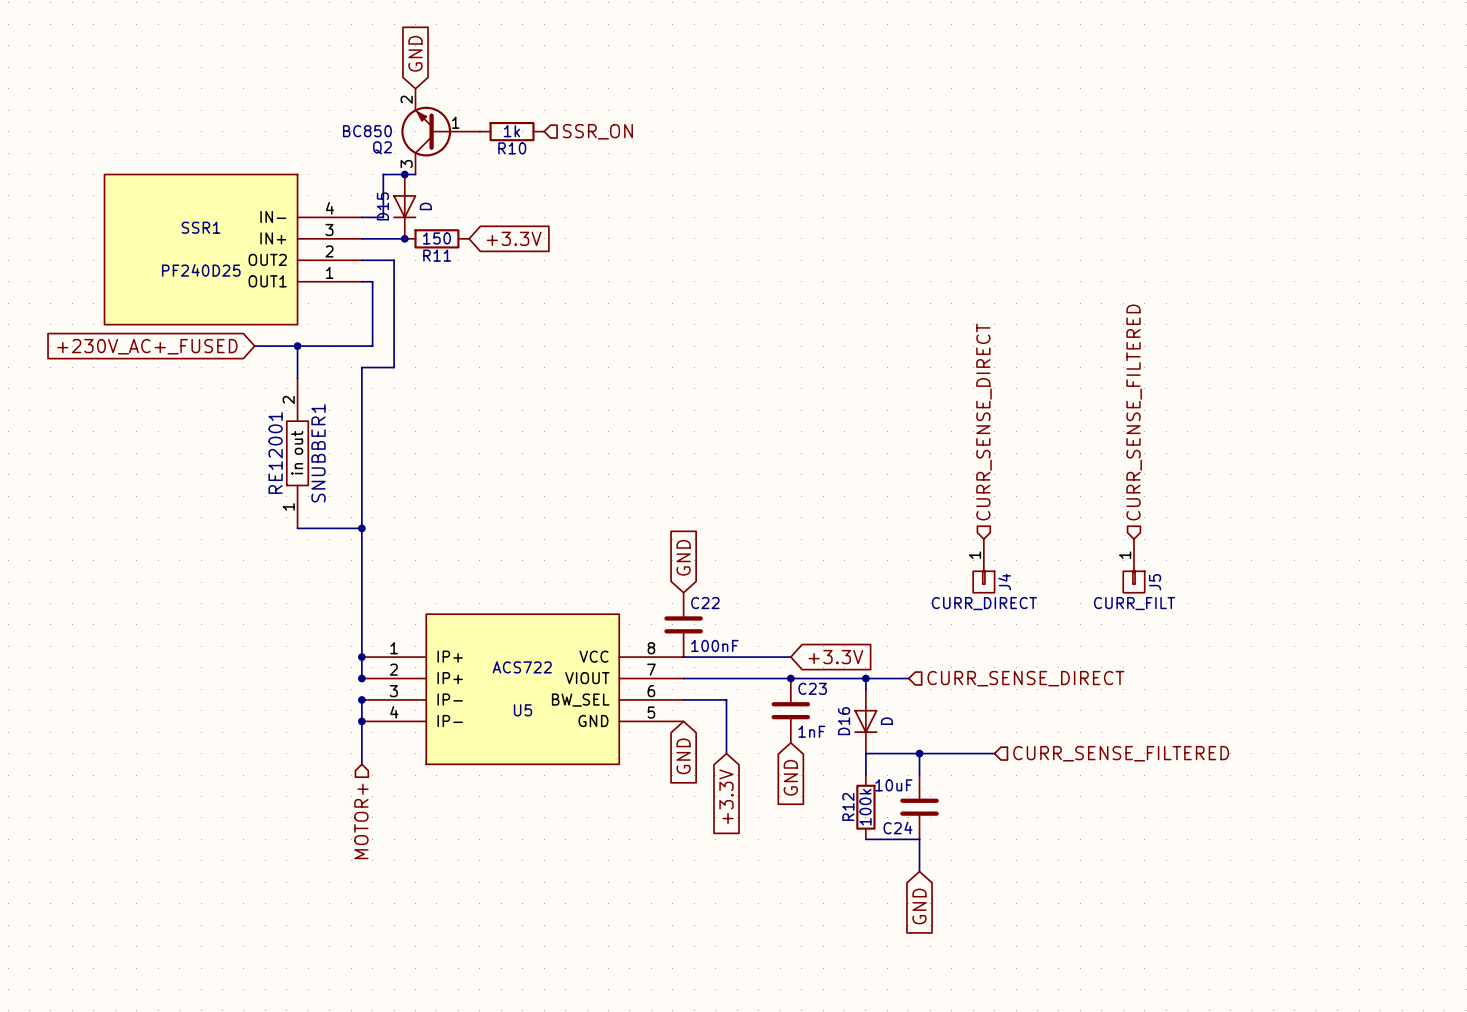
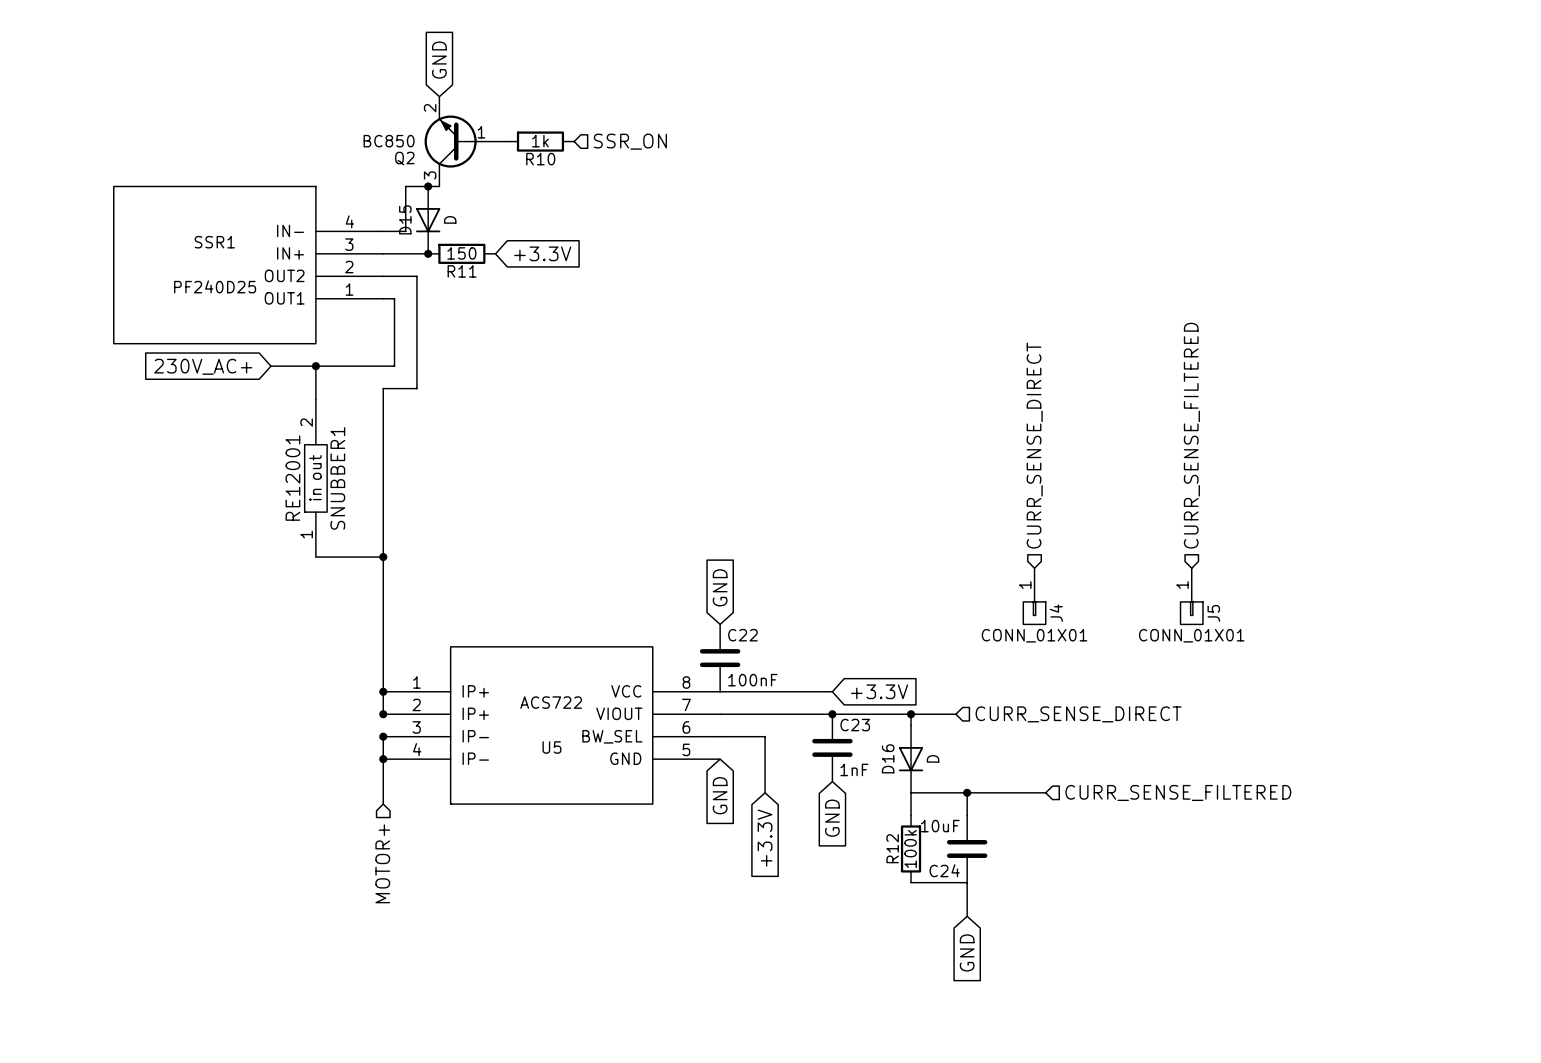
global label: +230V_AC+_FUSED (147, 346) -> 230V_AC+ (203, 366)
J4 value: CURR_DIRECT (984, 603) -> CONN_01X01 (1034, 635)
J5 value: CURR_FILT (1134, 603) -> CONN_01X01 (1191, 635)

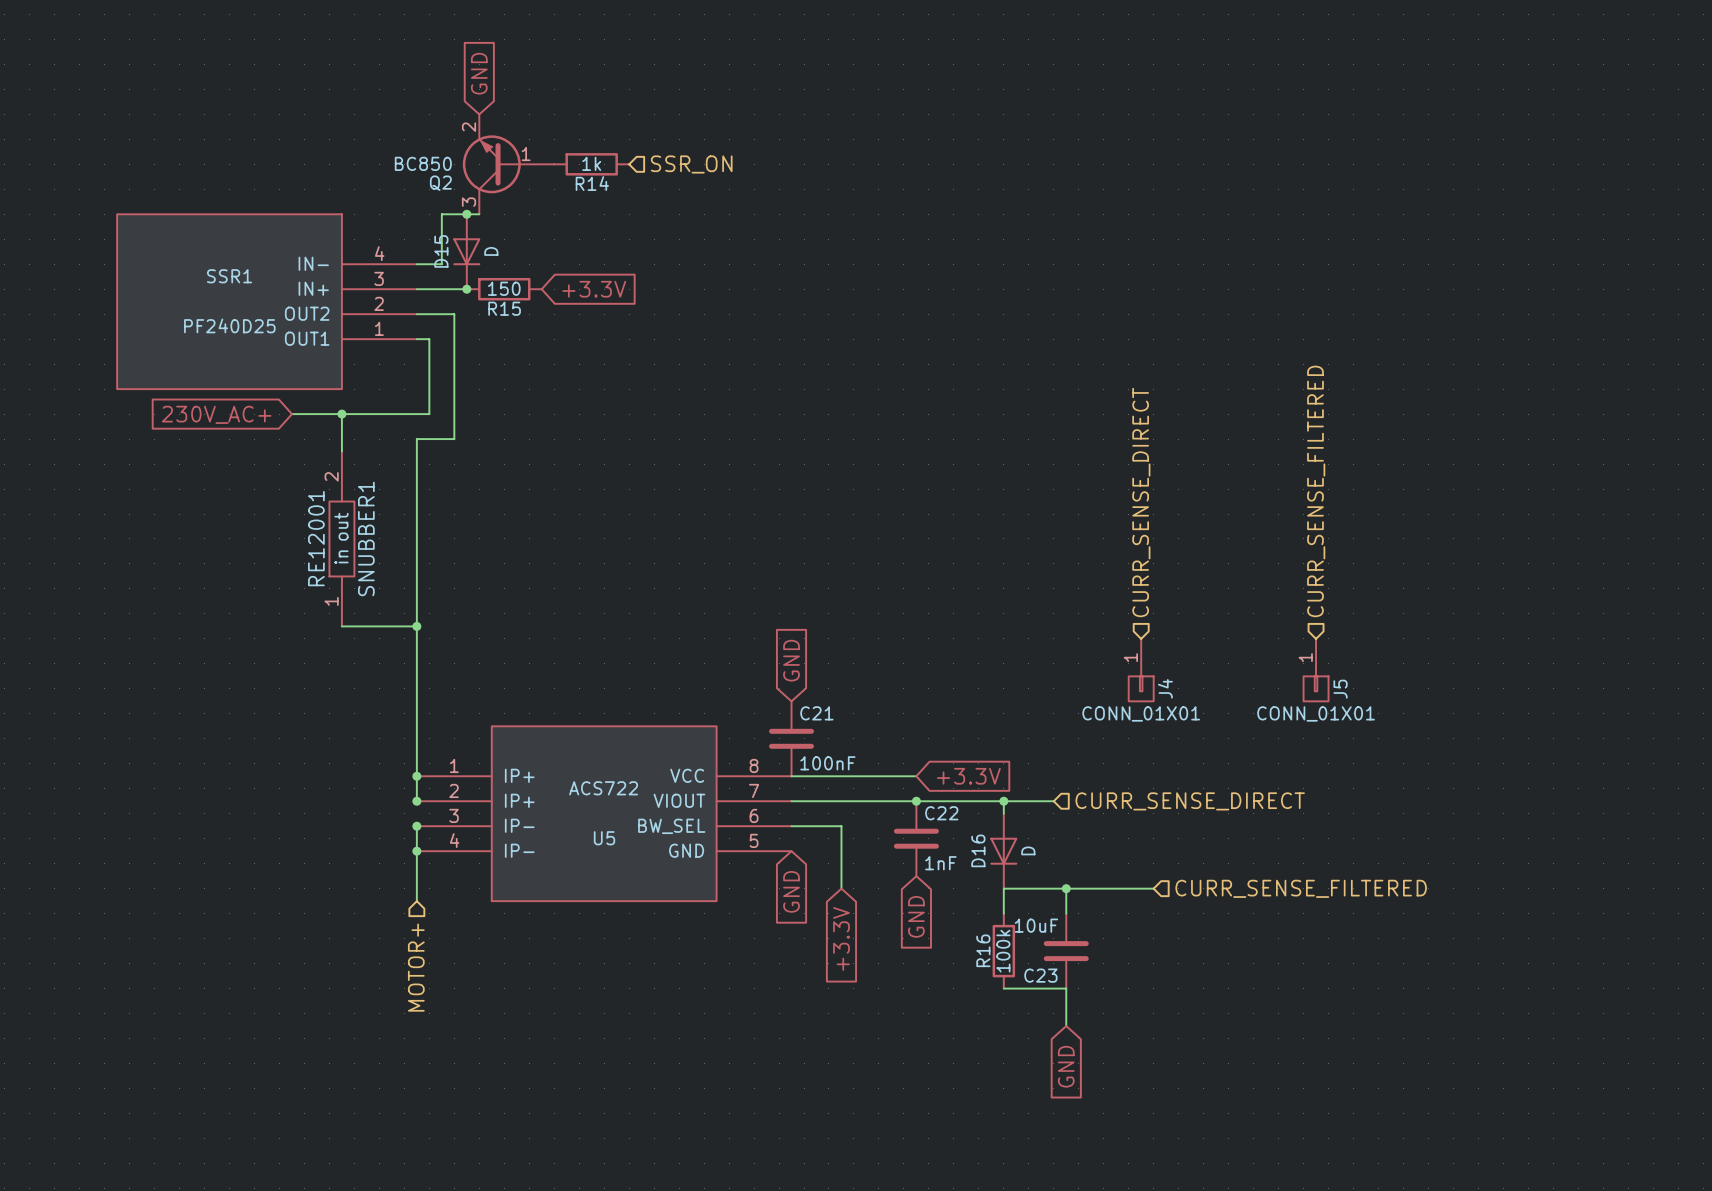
R10 name: R10 (540, 159) -> R14 (592, 183)
R11 name: R11 (462, 271) -> R15 (504, 308)
C22 name: C22 (742, 635) -> C21 (816, 713)
C23 name: C23 (855, 725) -> C22 (941, 813)
R12 name: R12 (892, 848) -> R16 (983, 950)
C24 name: C24 (944, 870) -> C23 (1040, 975)

